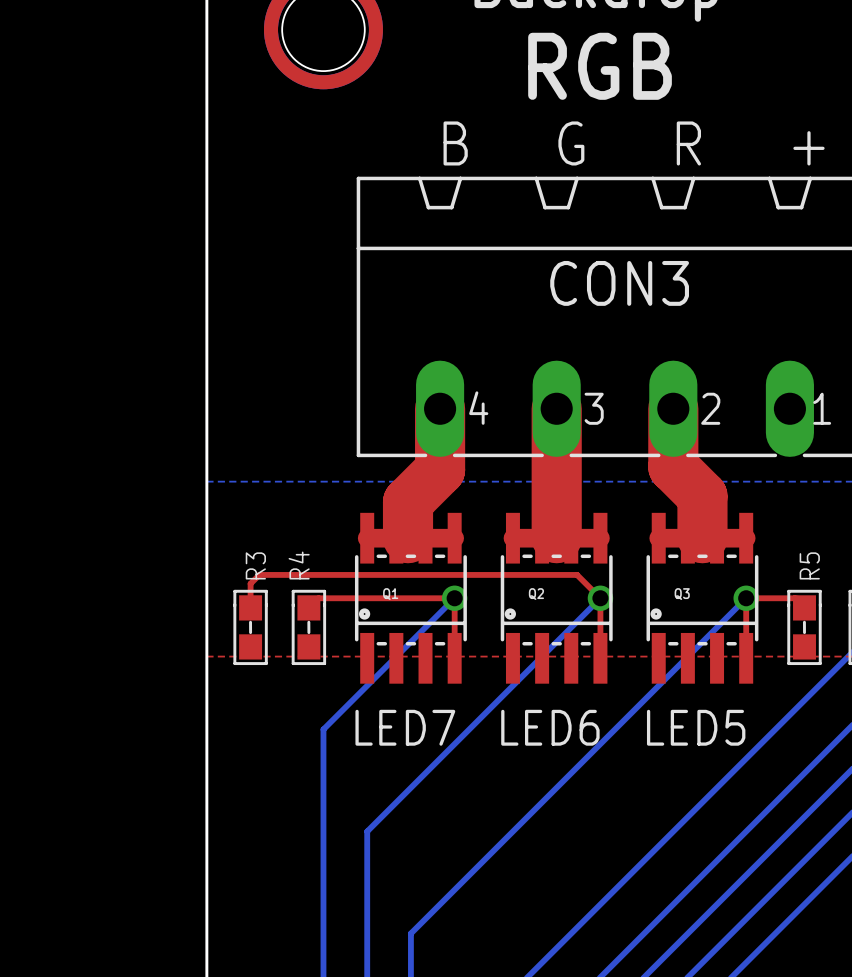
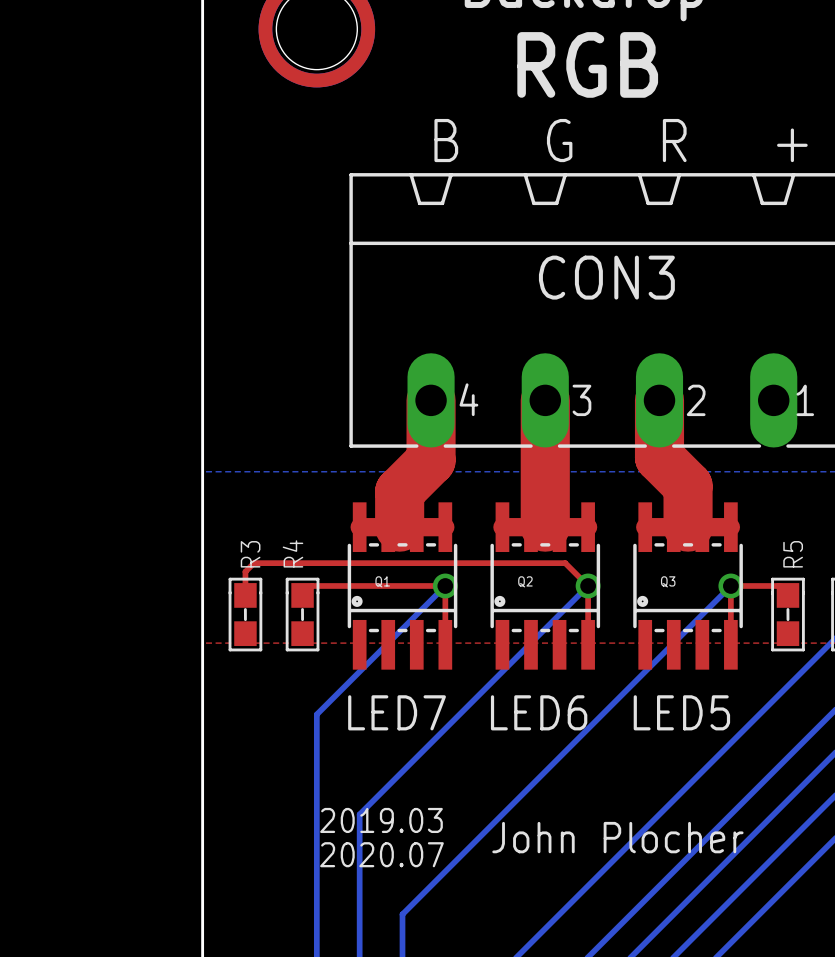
text: none -> 2019.03 (381, 820)
text: none -> John Plocher (617, 837)
text: none -> 2020.07 (381, 854)

